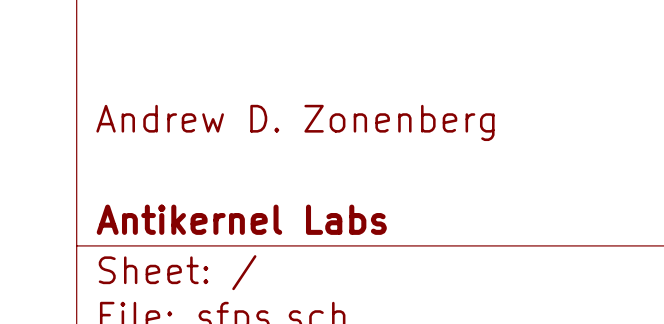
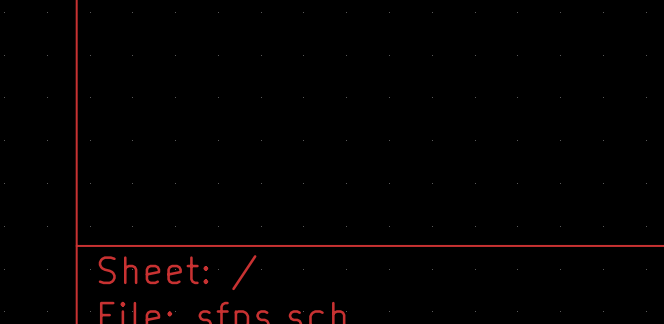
title block: Andrew D. Zonenberg (295, 122) -> none
title block: Antikernel Labs (241, 219) -> none

